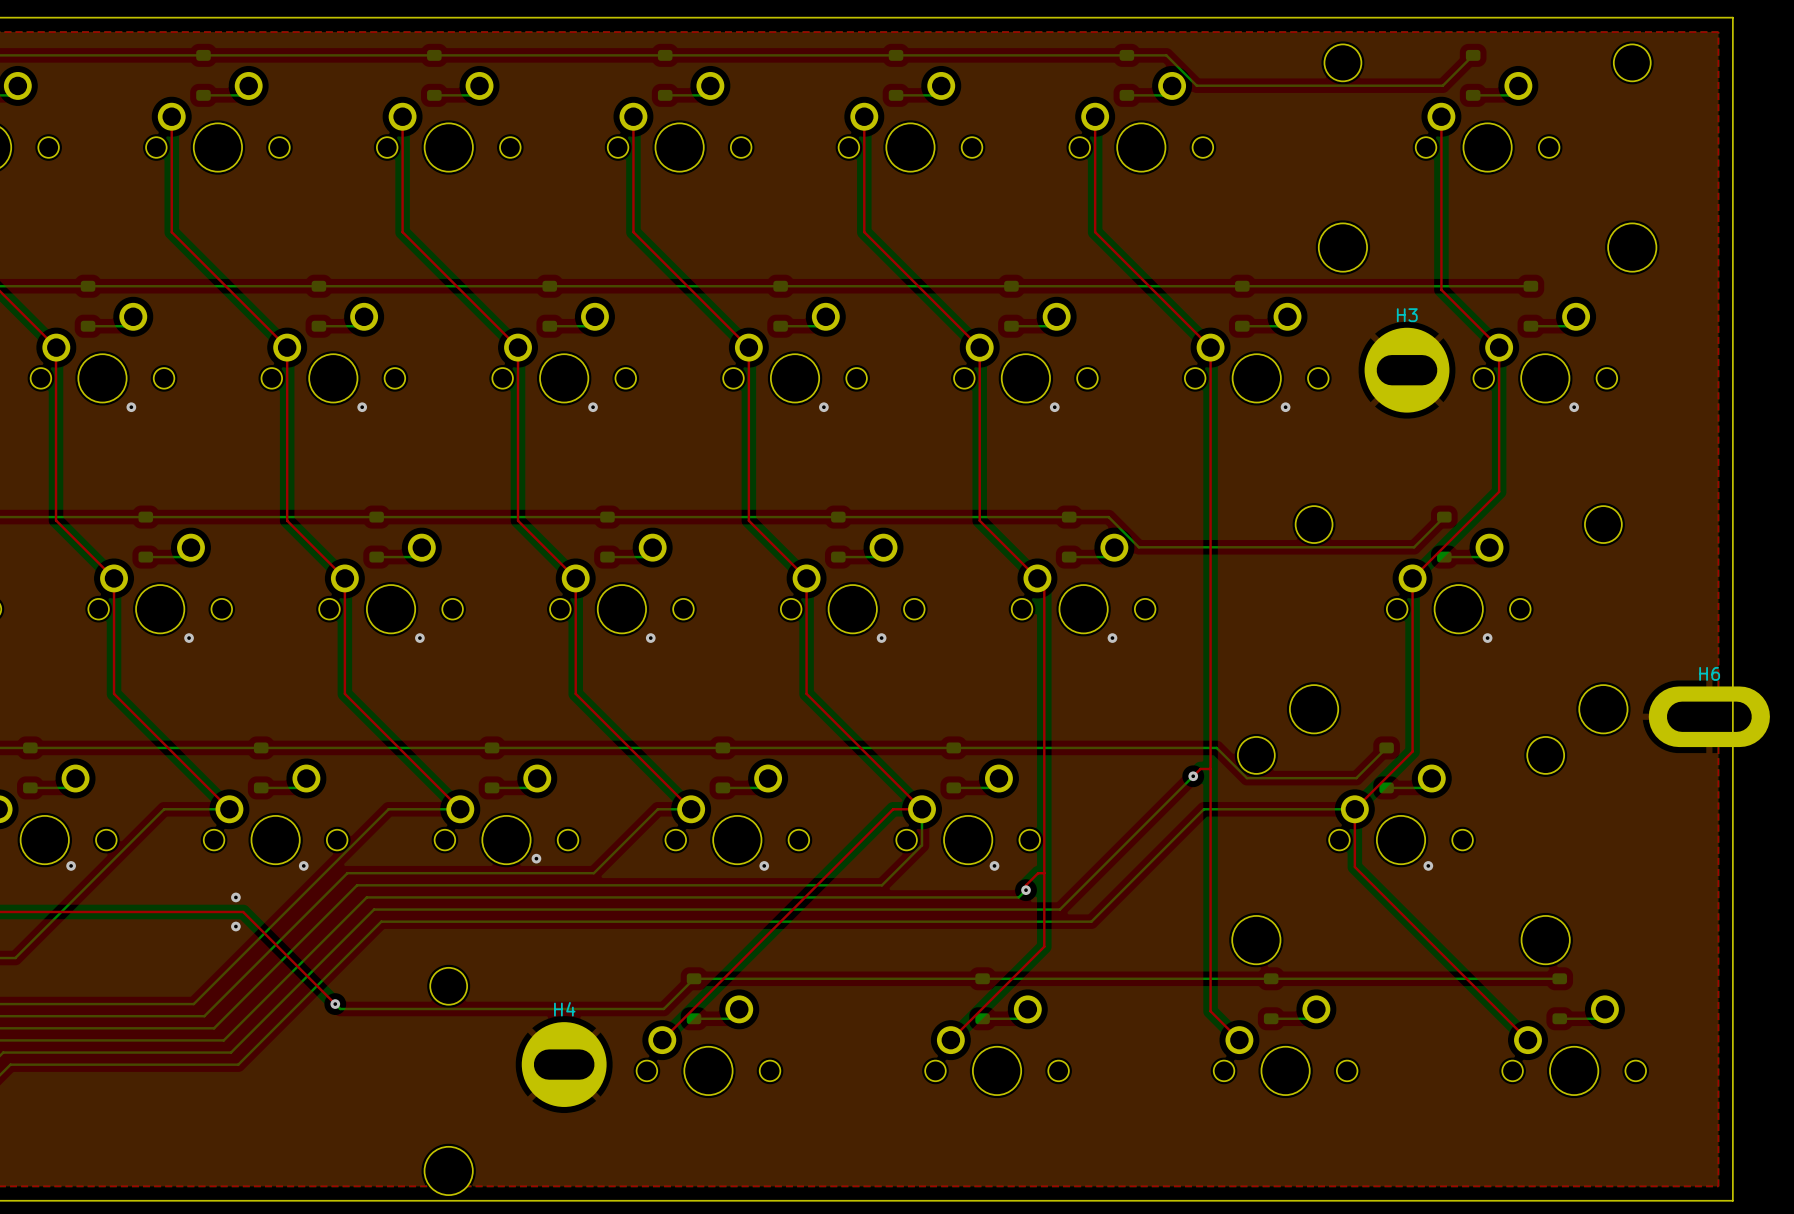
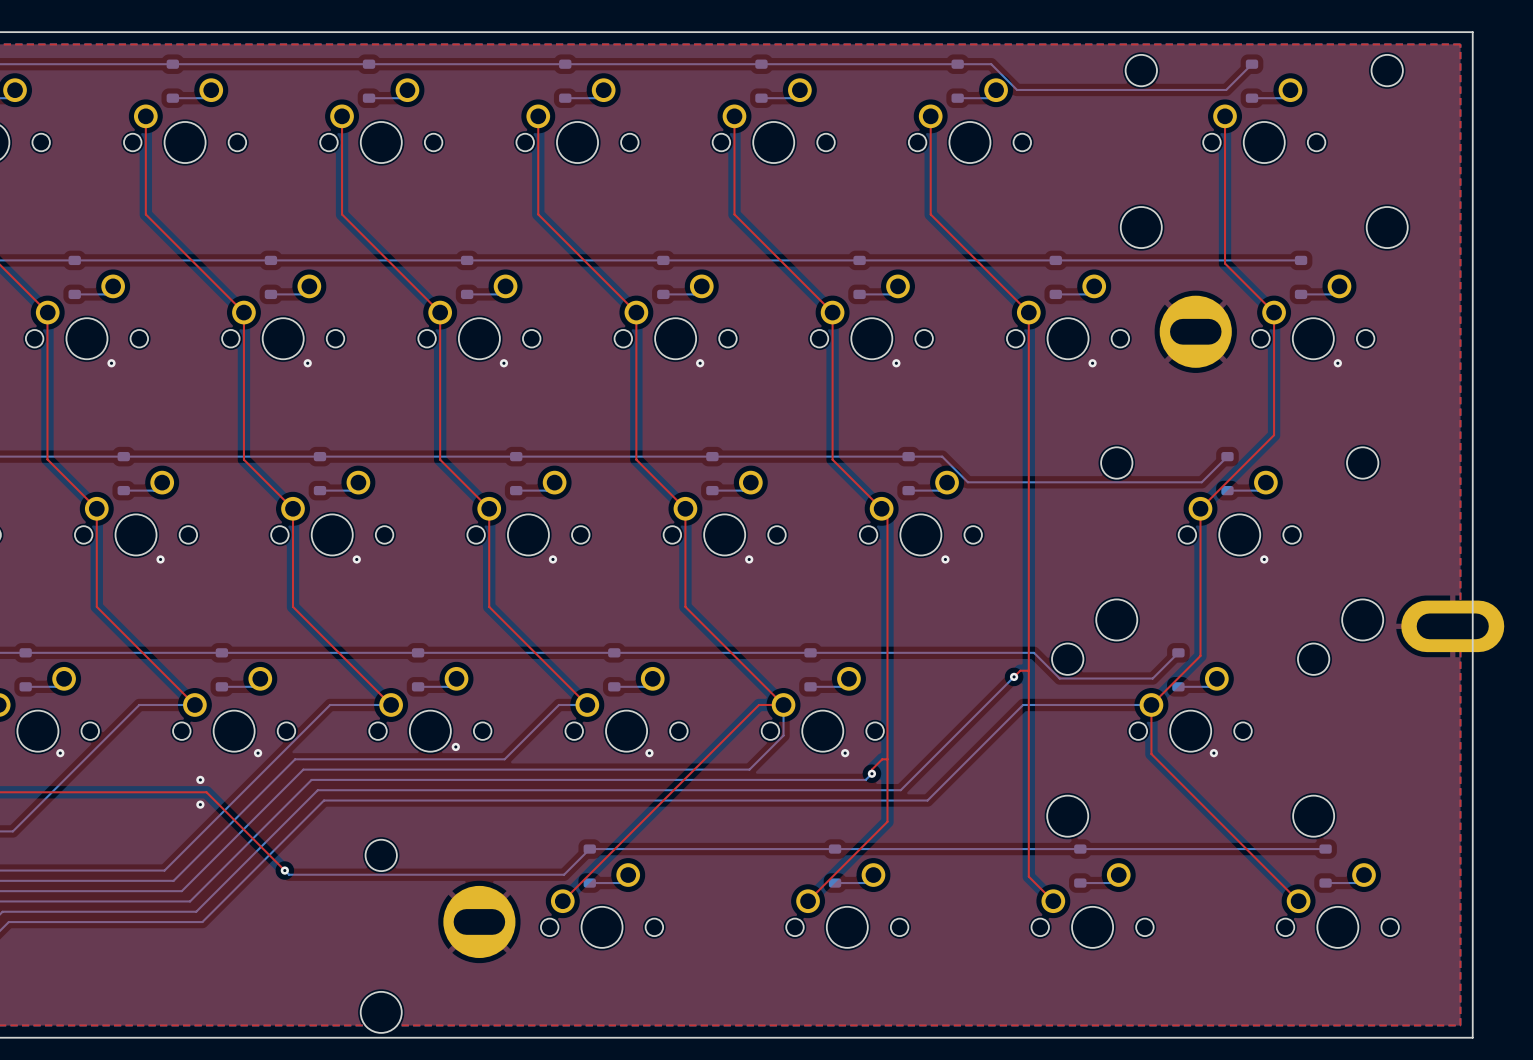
H3 name: H3 (1407, 315) -> none
H6 name: H6 (1709, 673) -> none
H4 name: H4 (564, 1009) -> none

